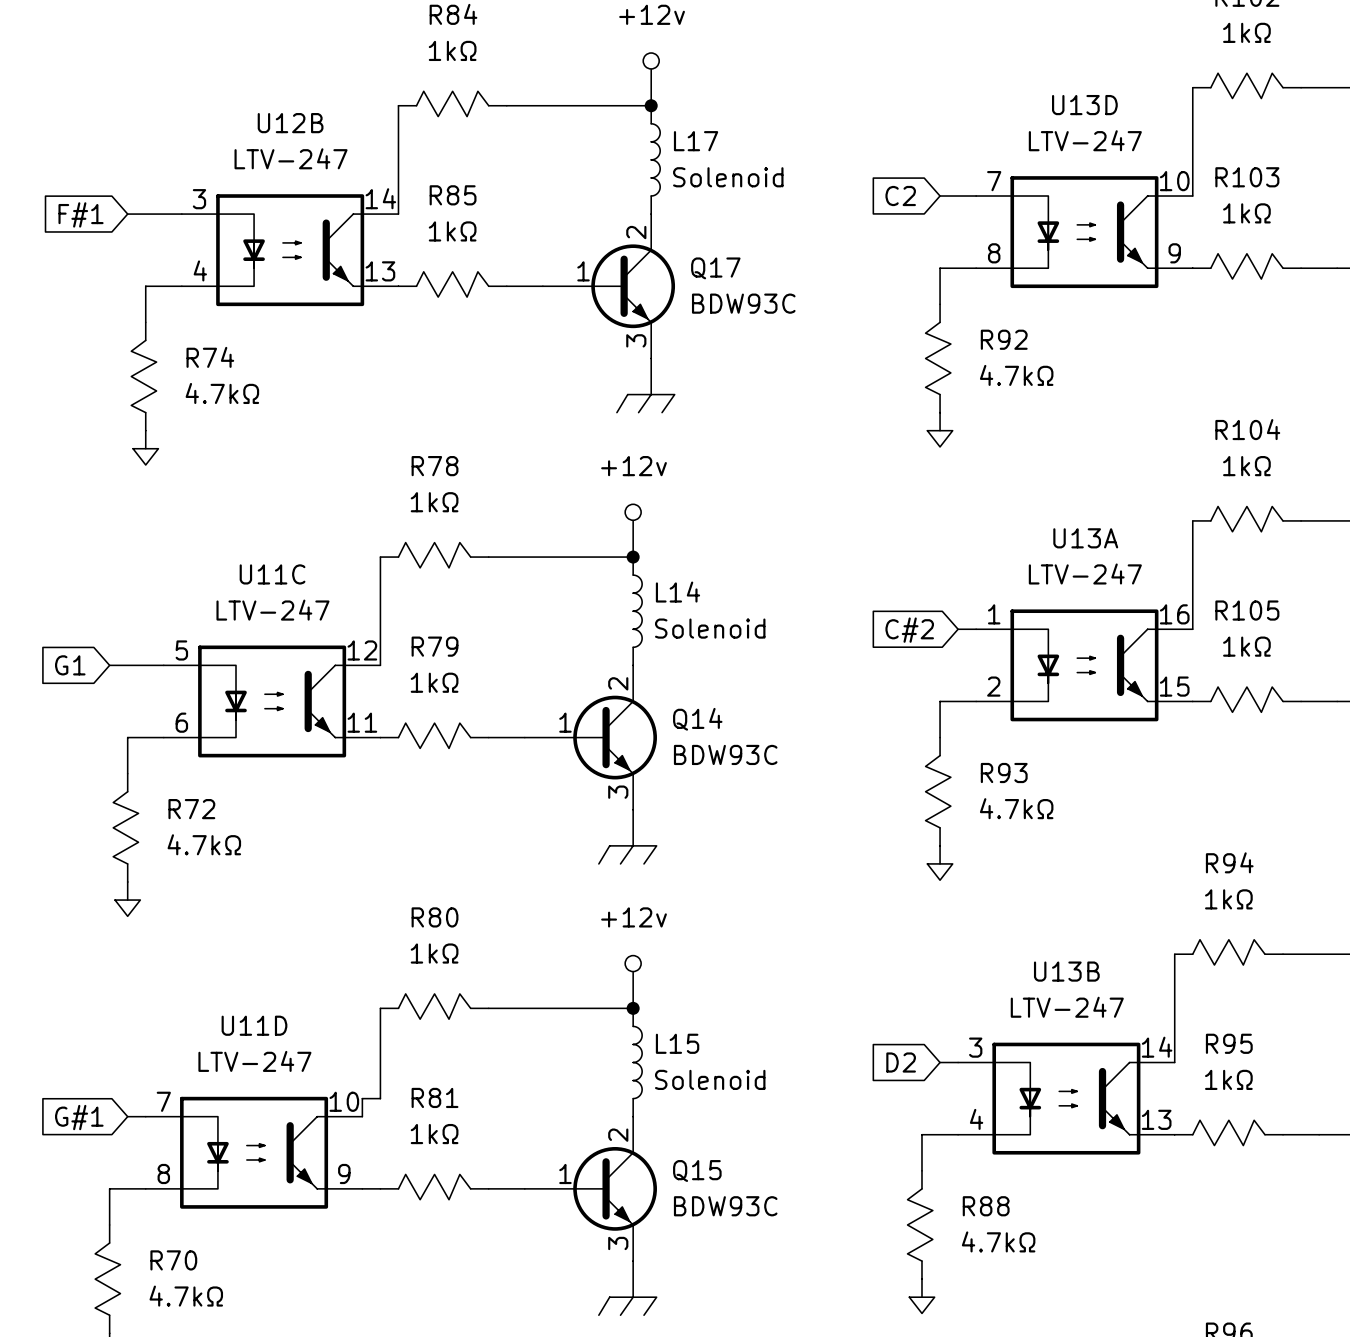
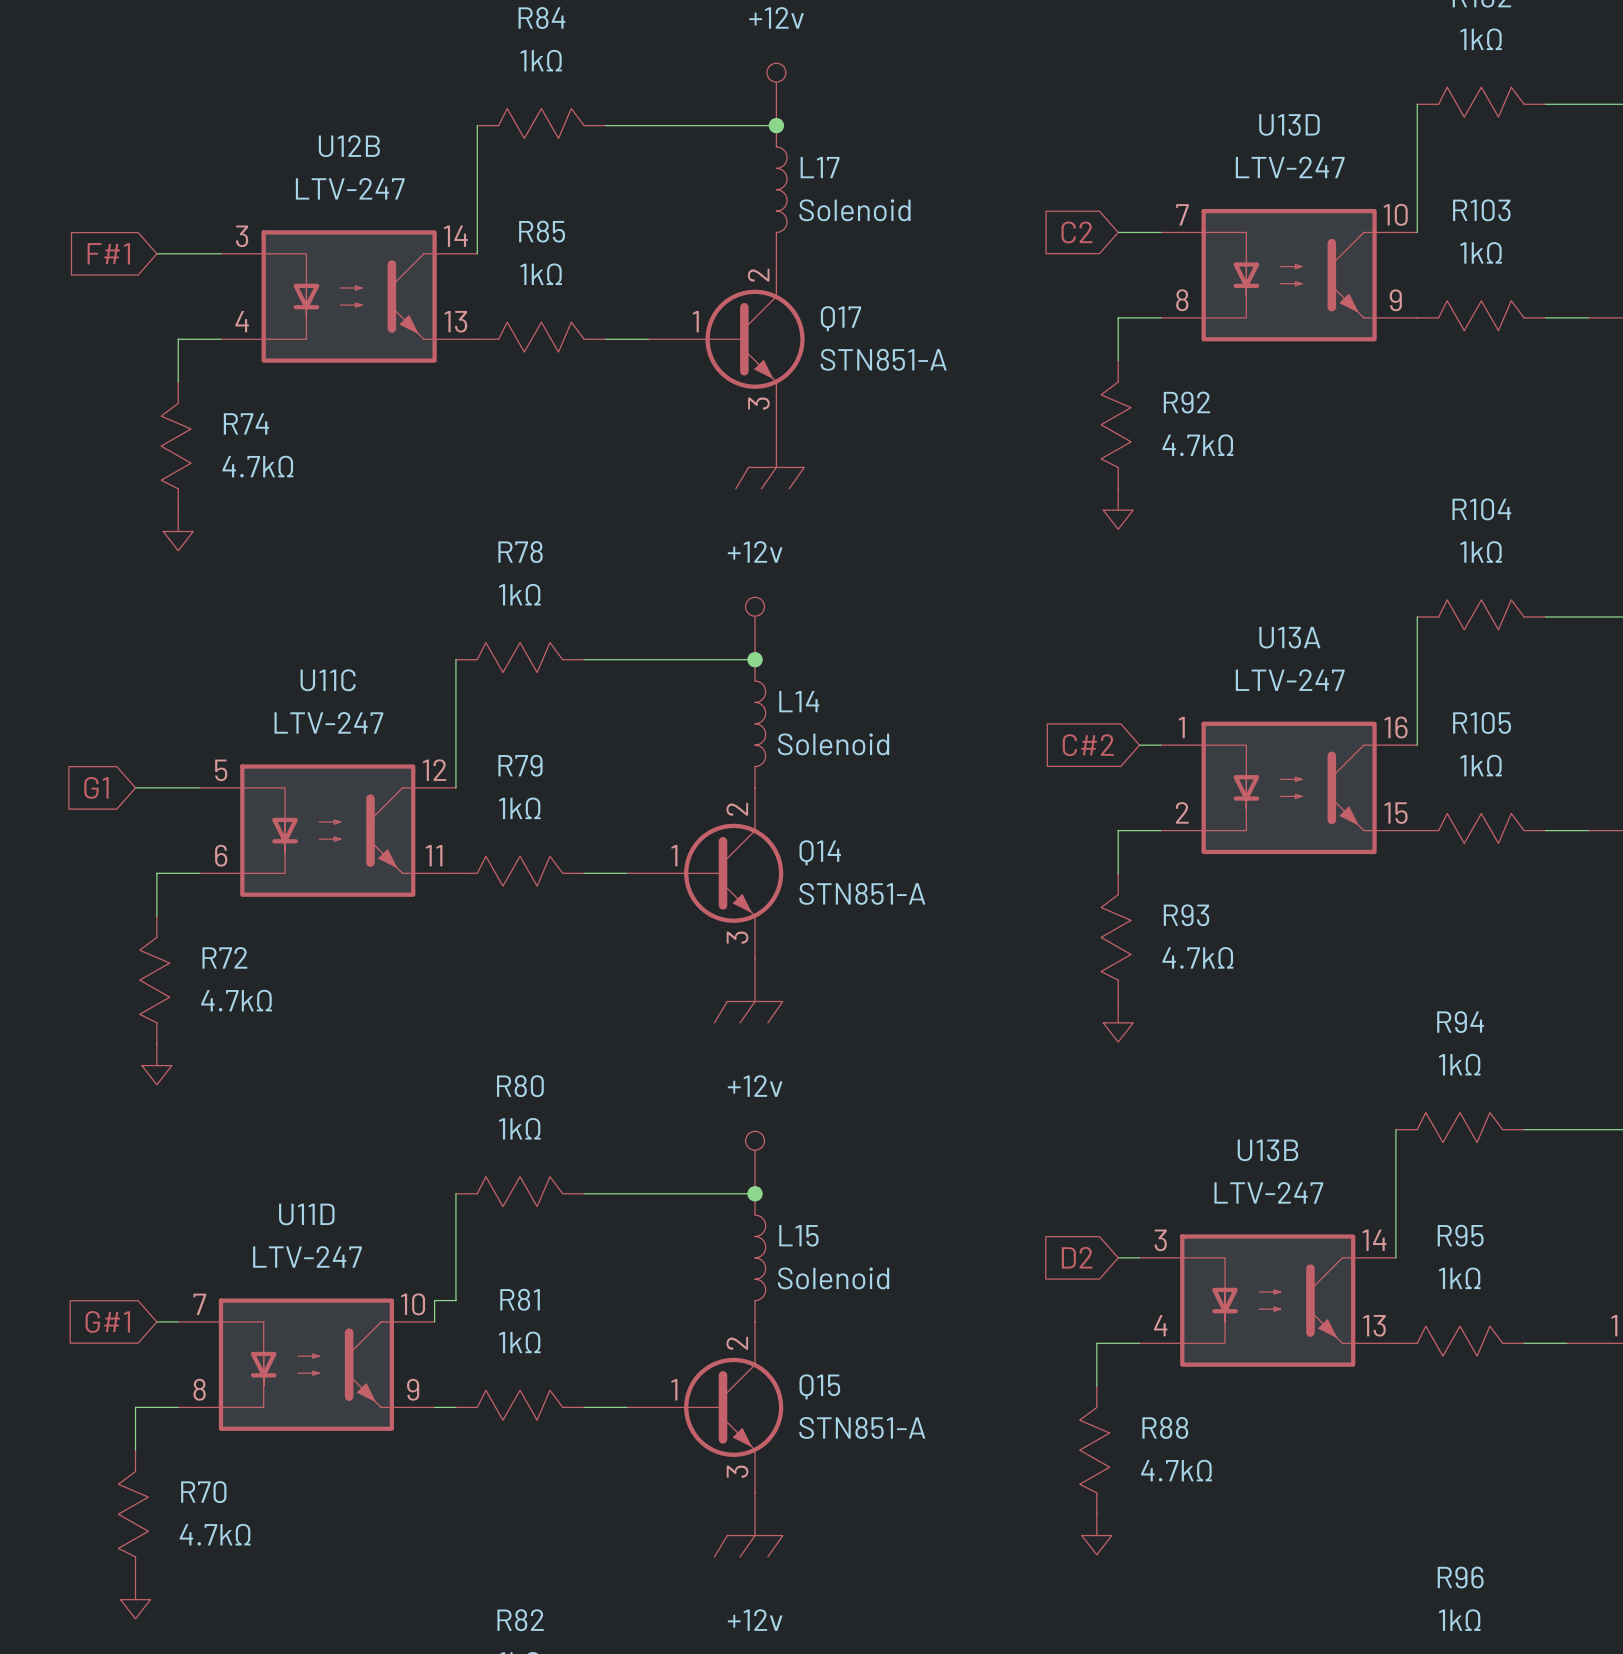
Q17 value: BDW93C (743, 303) -> STN851-A (883, 359)
Q14 value: BDW93C (725, 754) -> STN851-A (862, 893)
Q15 value: BDW93C (725, 1206) -> STN851-A (862, 1427)

